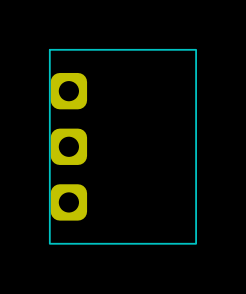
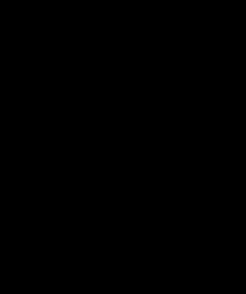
part: (122, 146) -> none

